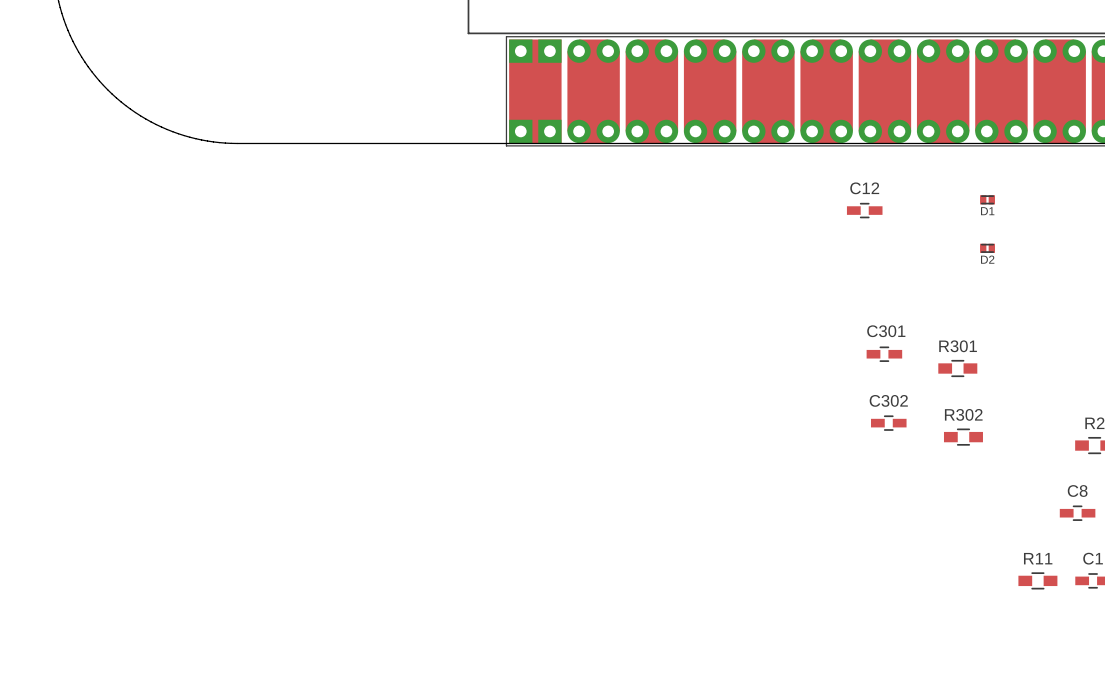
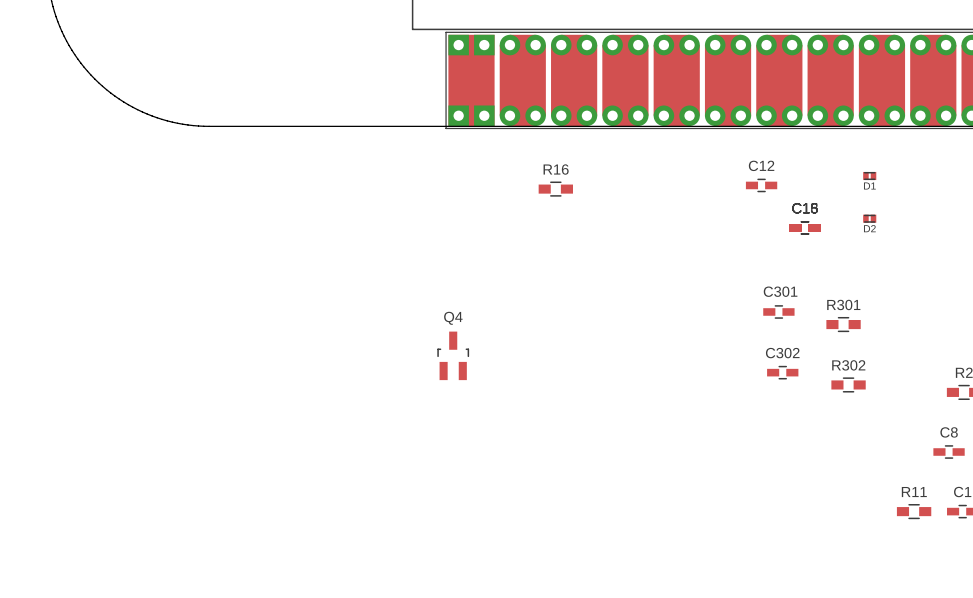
R16: none -> (555, 189)
part: none -> (805, 227)
part: none -> (805, 227)
part: none -> (805, 227)
Q4: none -> (453, 355)

